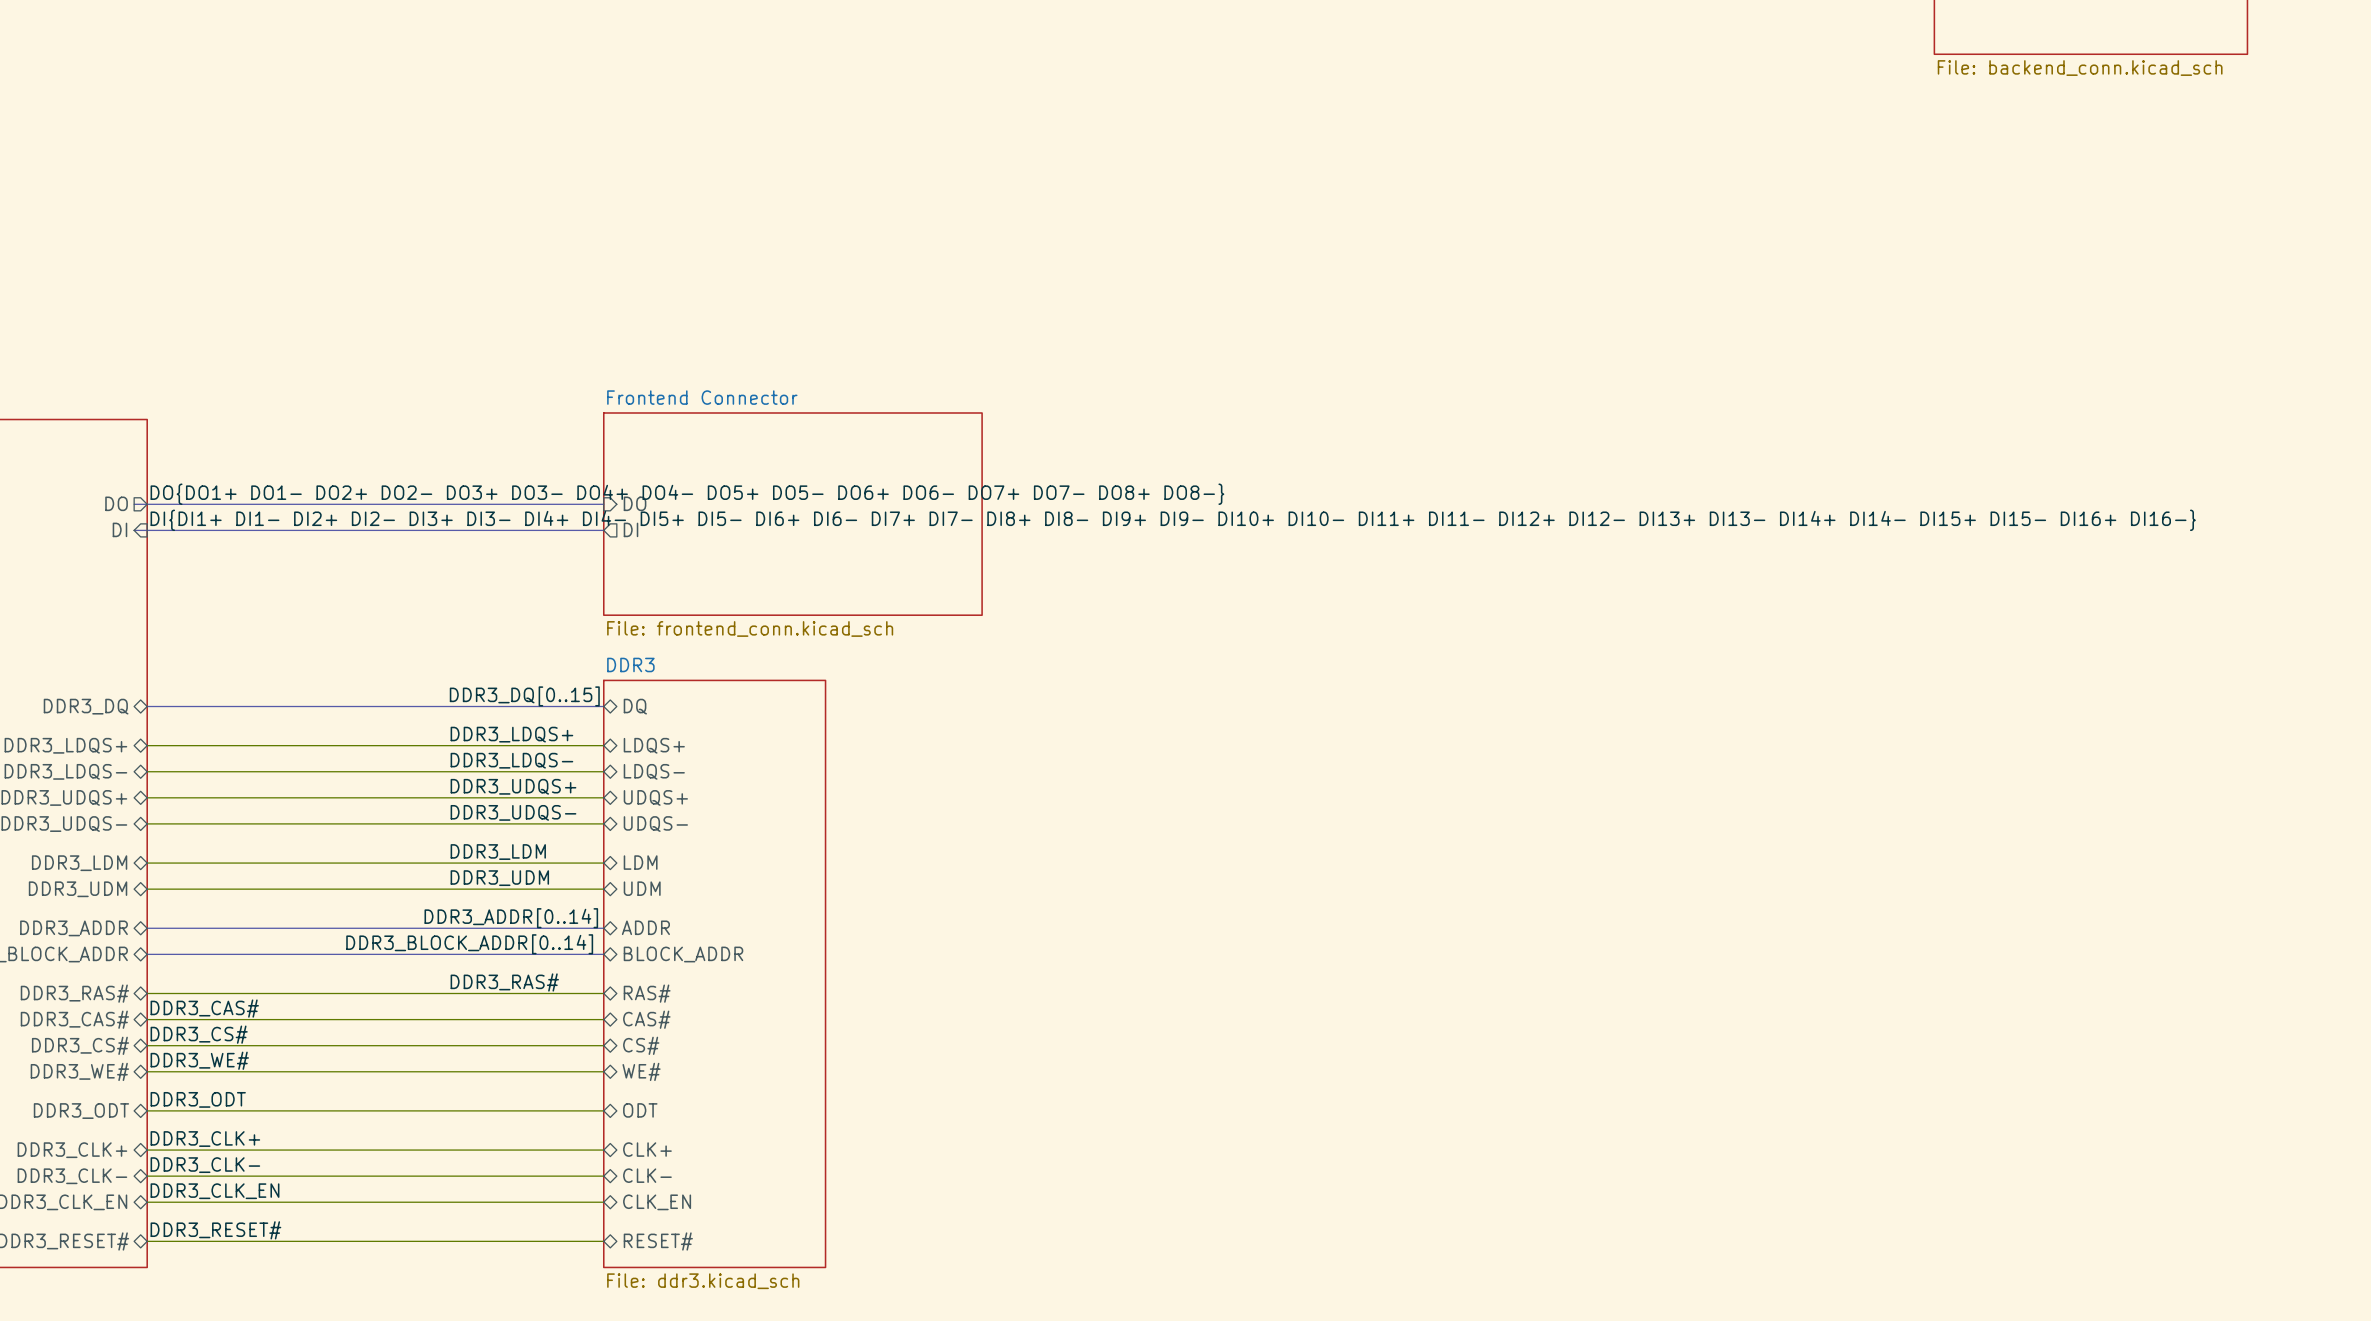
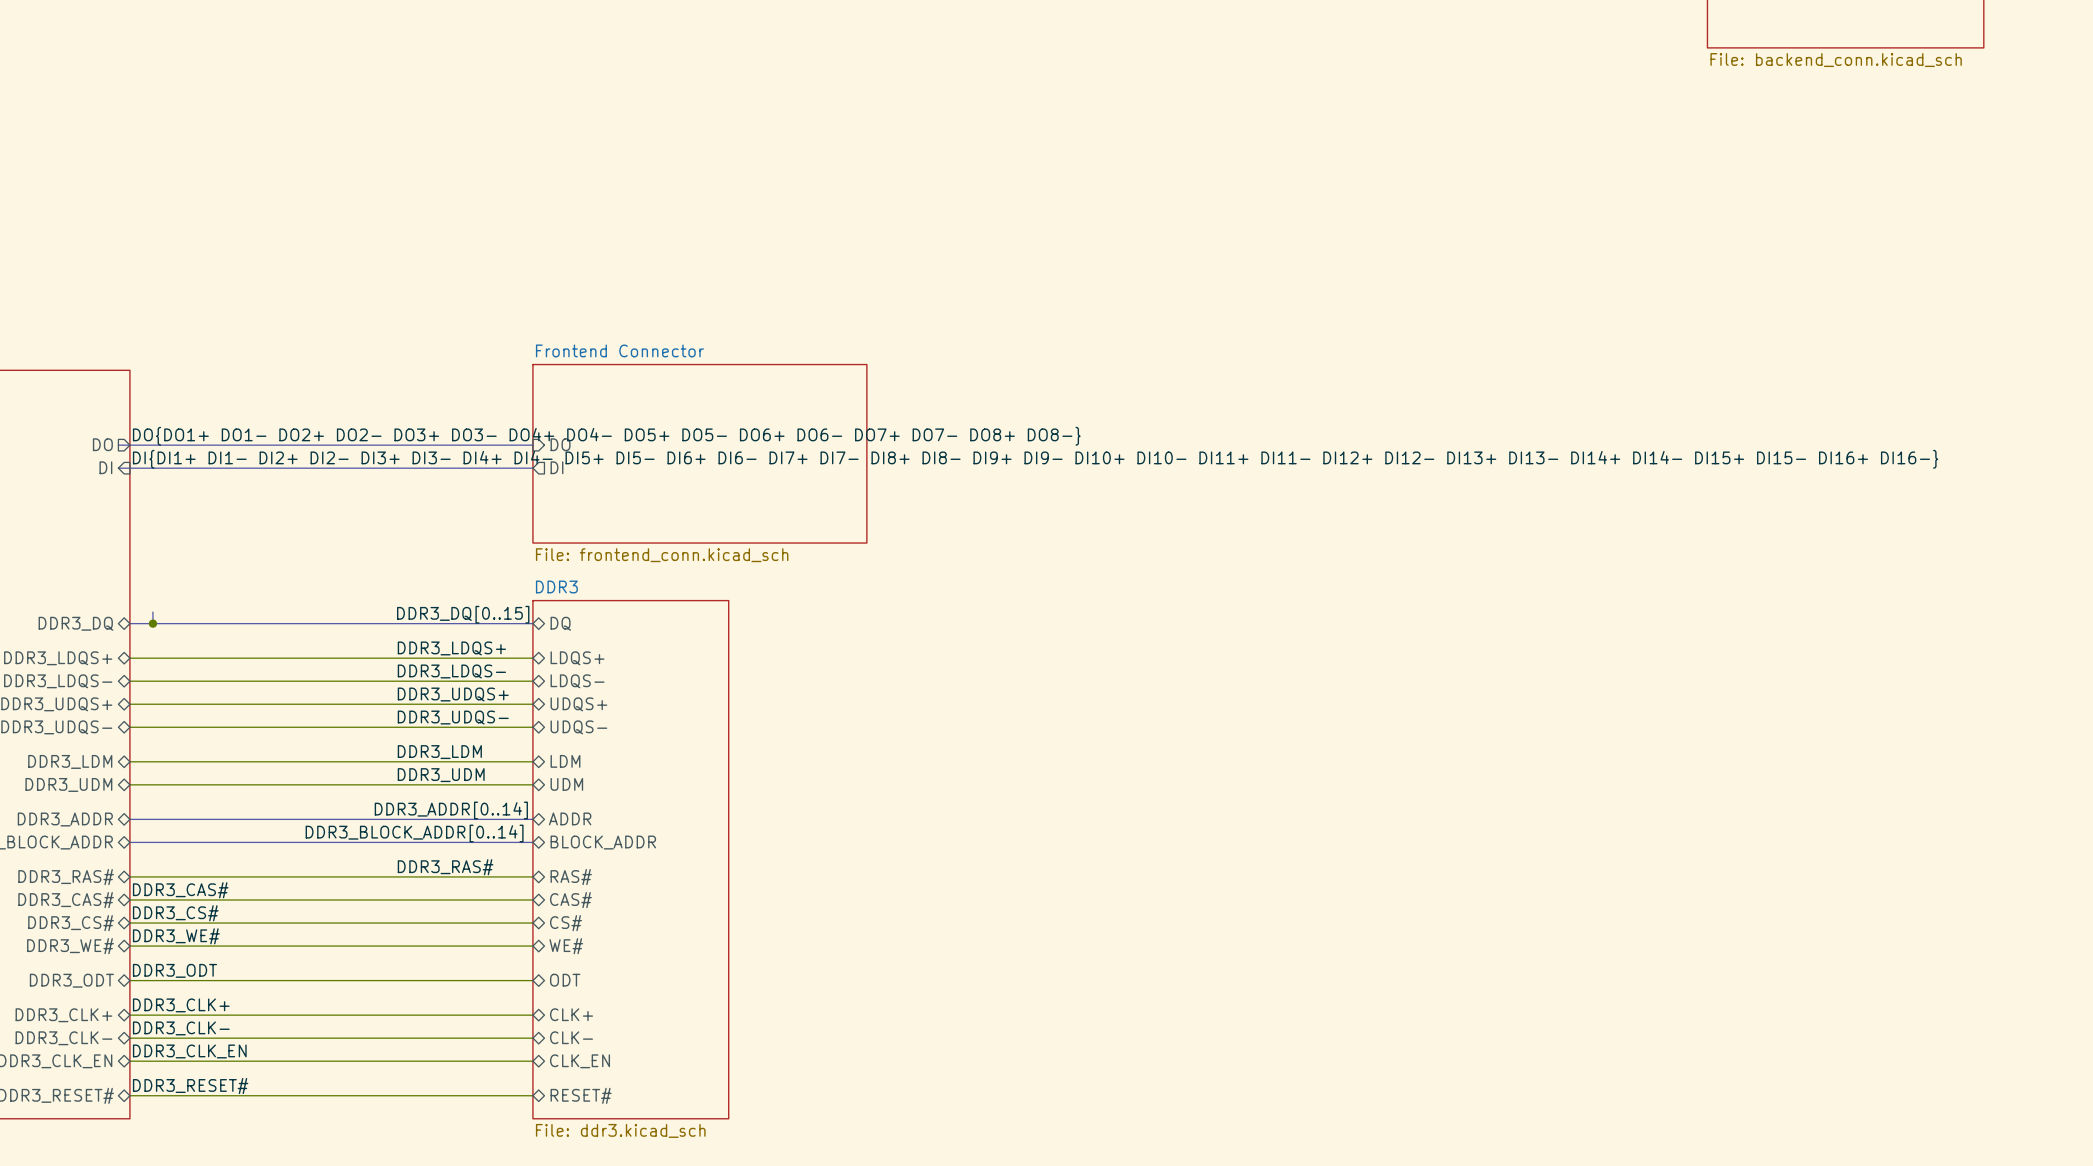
bus: none -> (152, 612) (152, 623)
junction: none -> (152, 623)

